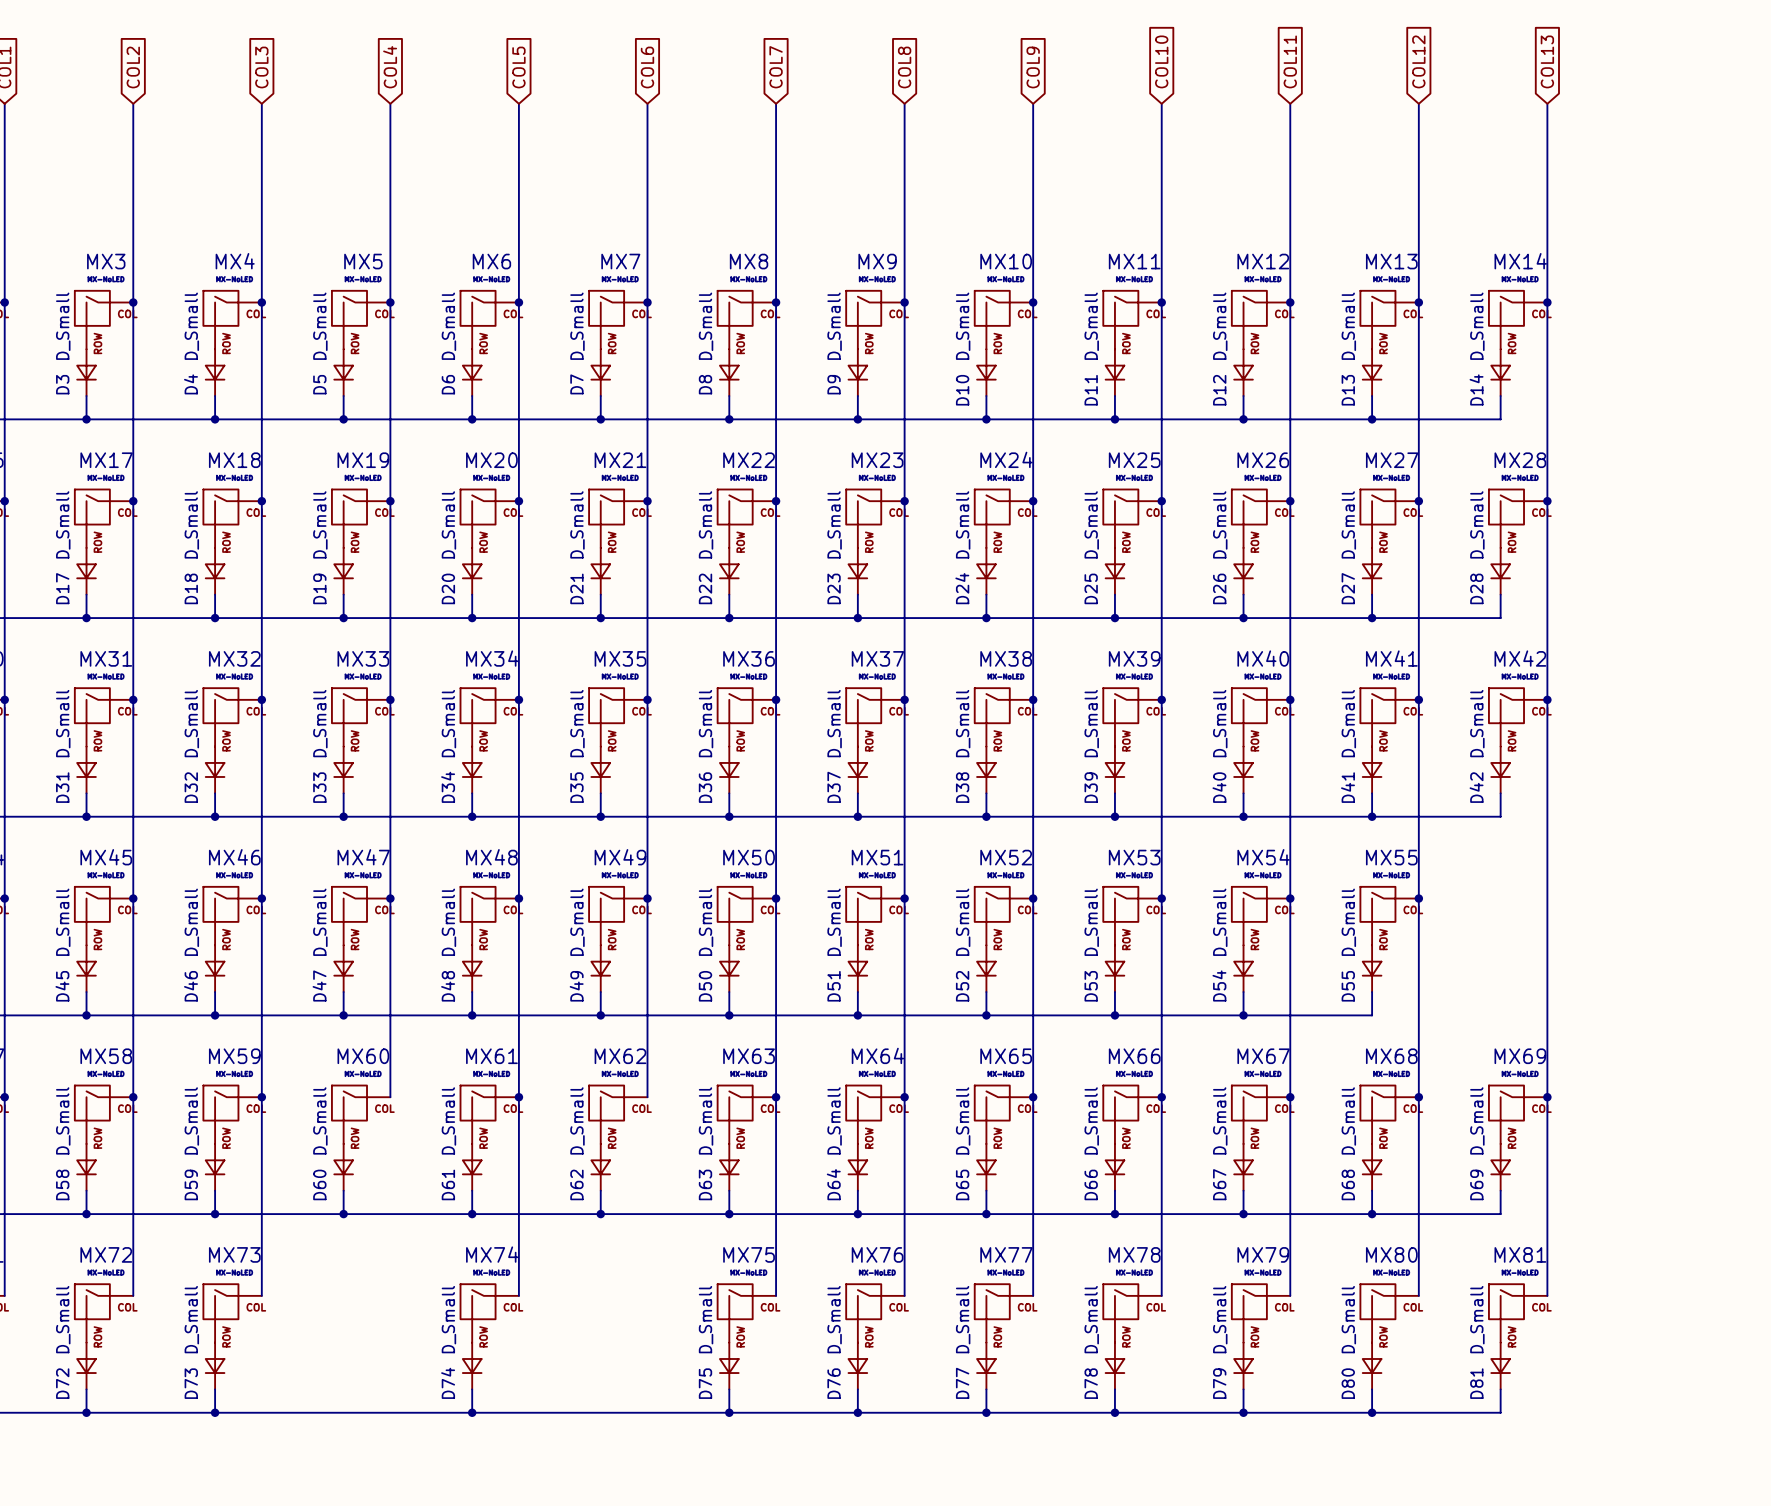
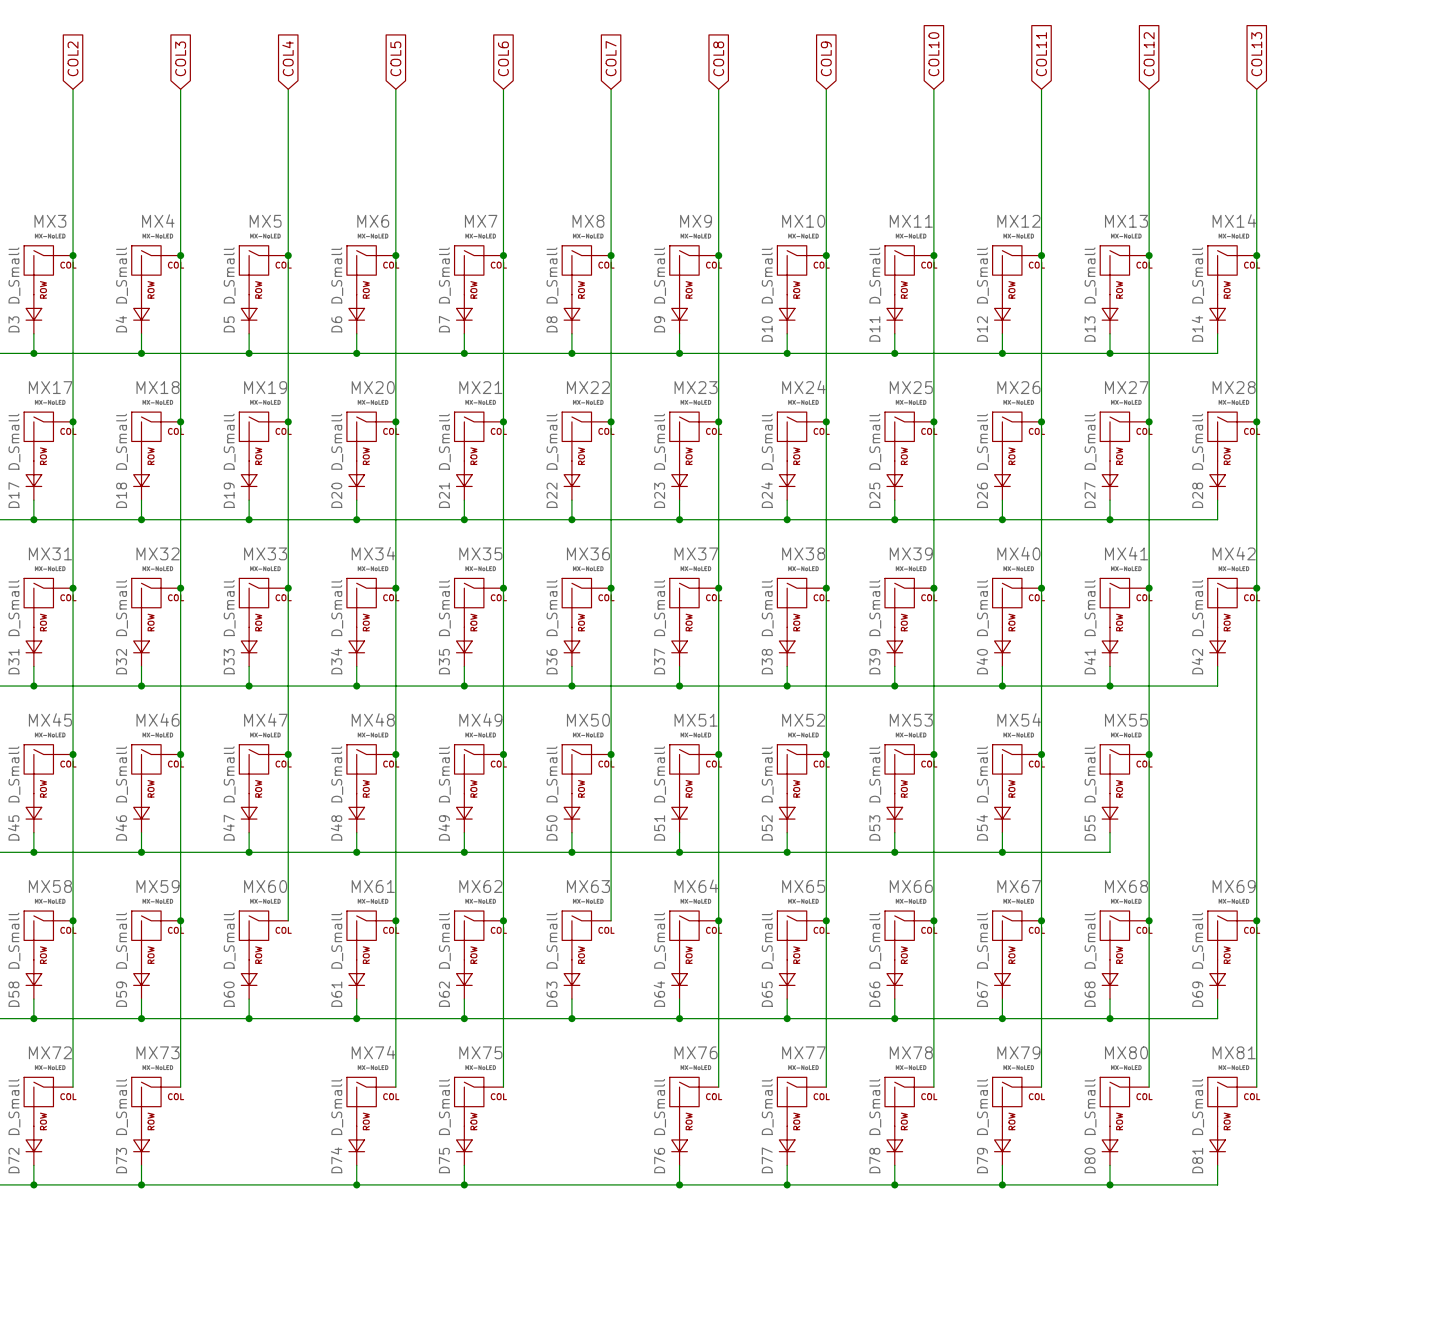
junction: none -> (503, 920)
wire: (776, 1097) (776, 1295) -> (503, 920) (503, 1087)
junction: (776, 1097) -> none
MX75 position: (746, 1313) -> (479, 1101)
D75 position: (729, 1366) -> (464, 1145)
wire: (729, 1389) (729, 1412) -> (464, 1165) (464, 1184)
junction: none -> (464, 1184)
junction: (729, 1412) -> none

